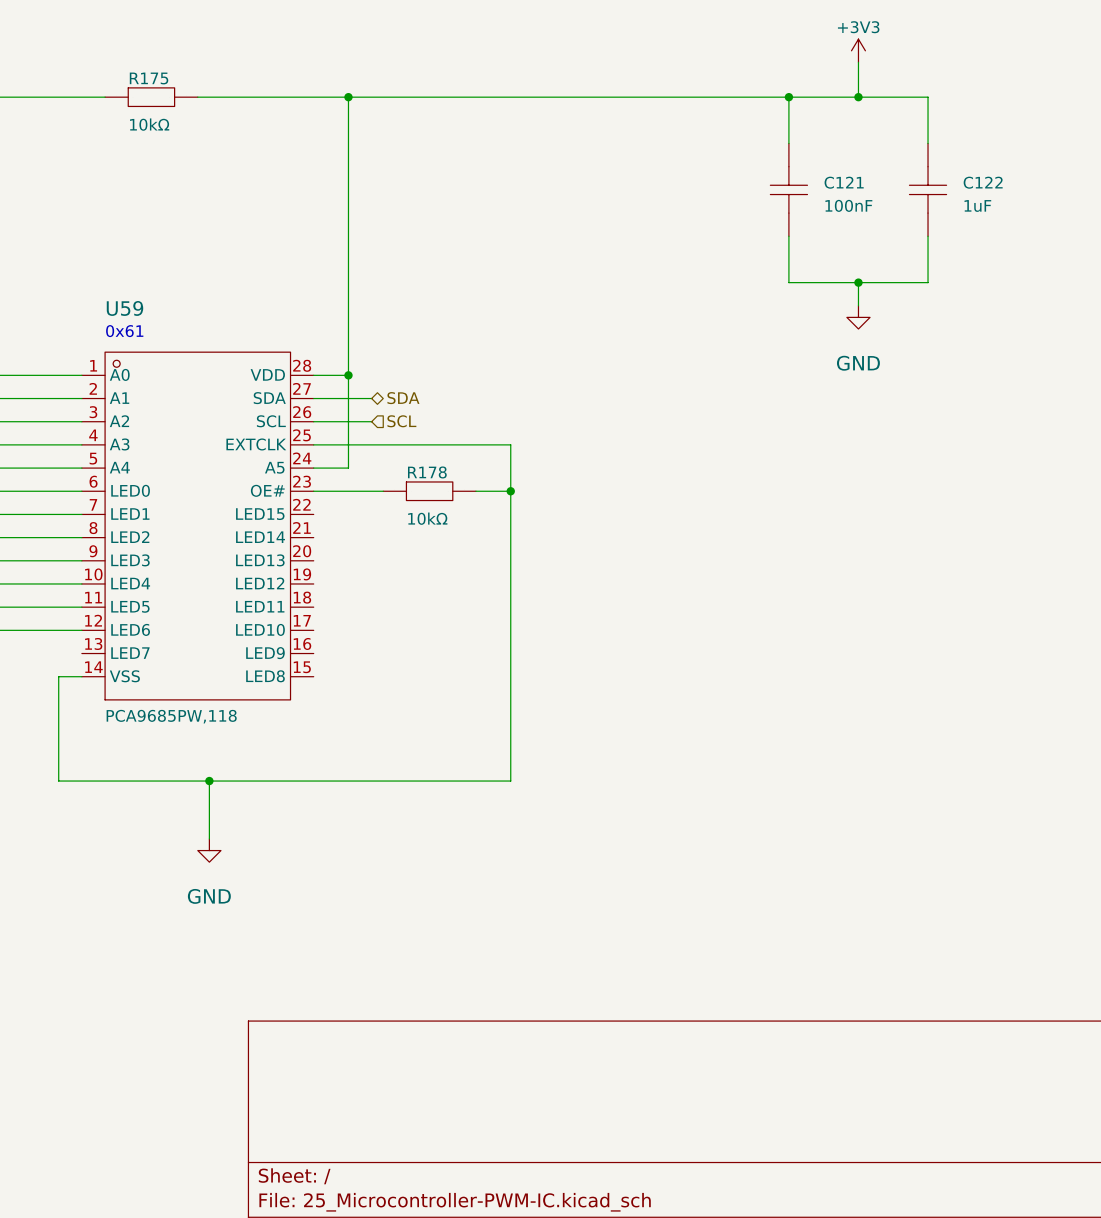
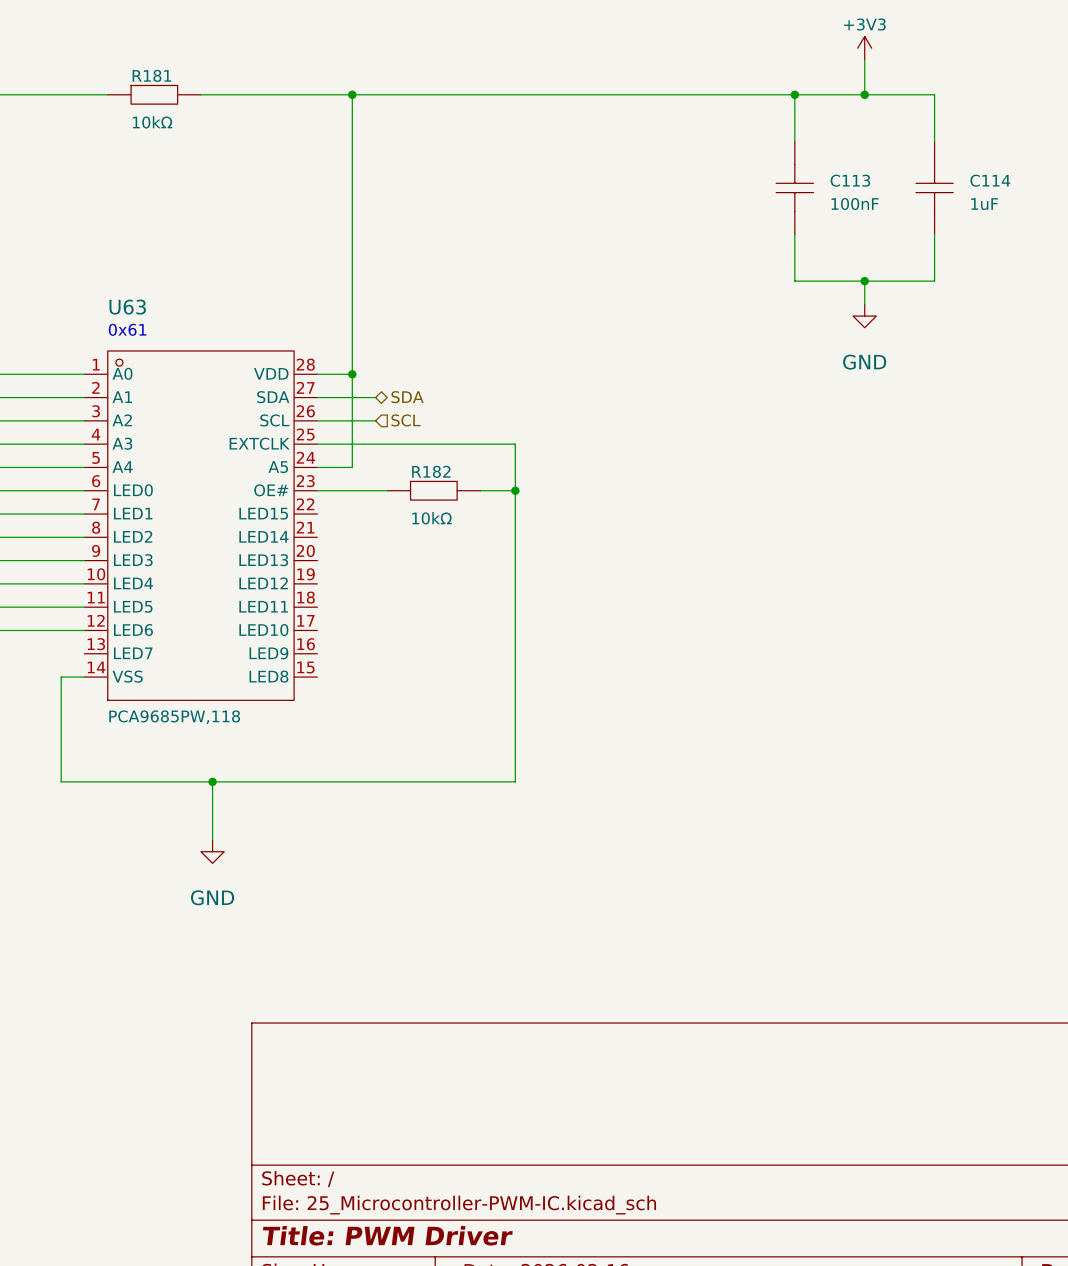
R175 name: R175 (149, 78) -> R181 (151, 75)
C121 name: C121 (844, 182) -> C113 (850, 180)
C122 name: C122 (983, 182) -> C114 (990, 180)
U59 name: U59 (124, 308) -> U63 (127, 307)
R178 name: R178 (427, 472) -> R182 (431, 471)

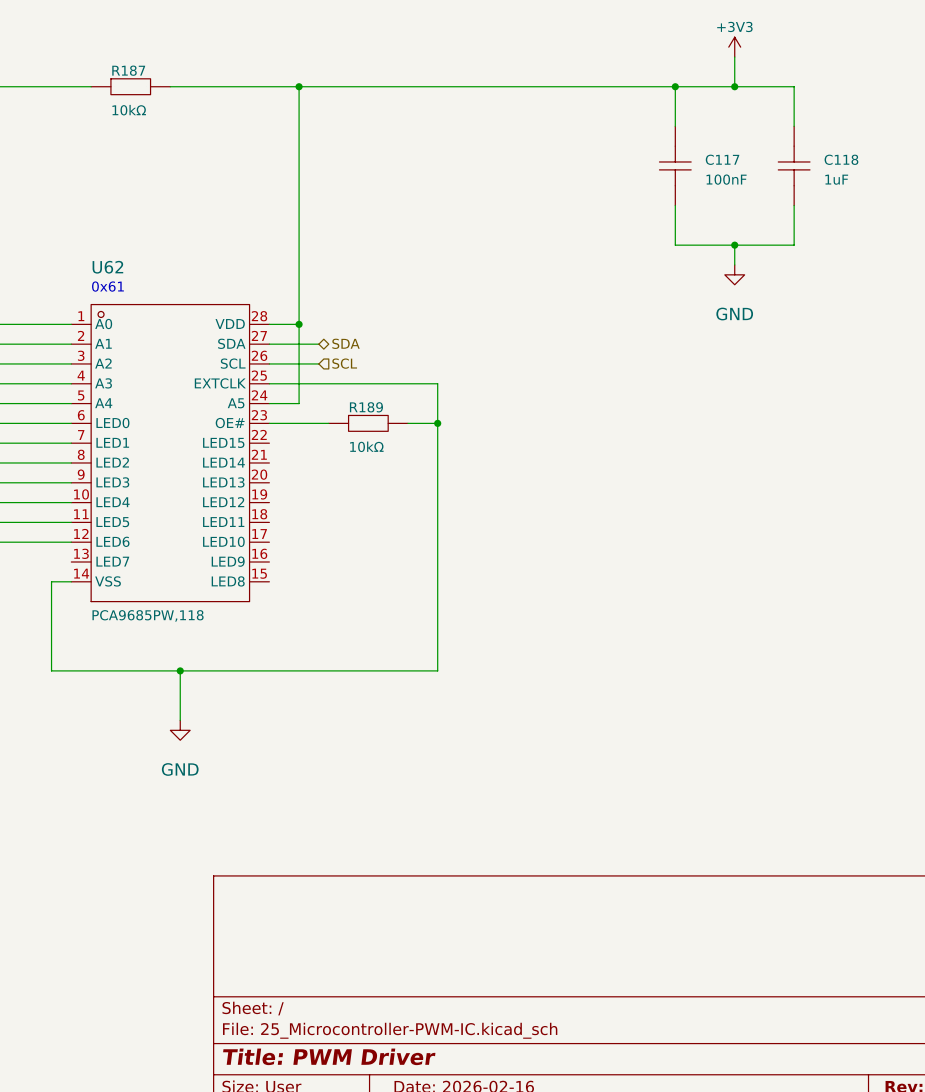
R181 name: R181 (151, 75) -> R187 (128, 70)
C113 name: C113 (850, 180) -> C117 (722, 159)
C114 name: C114 (990, 180) -> C118 (841, 159)
U63 name: U63 (127, 307) -> U62 (107, 267)
R182 name: R182 (431, 471) -> R189 (366, 407)

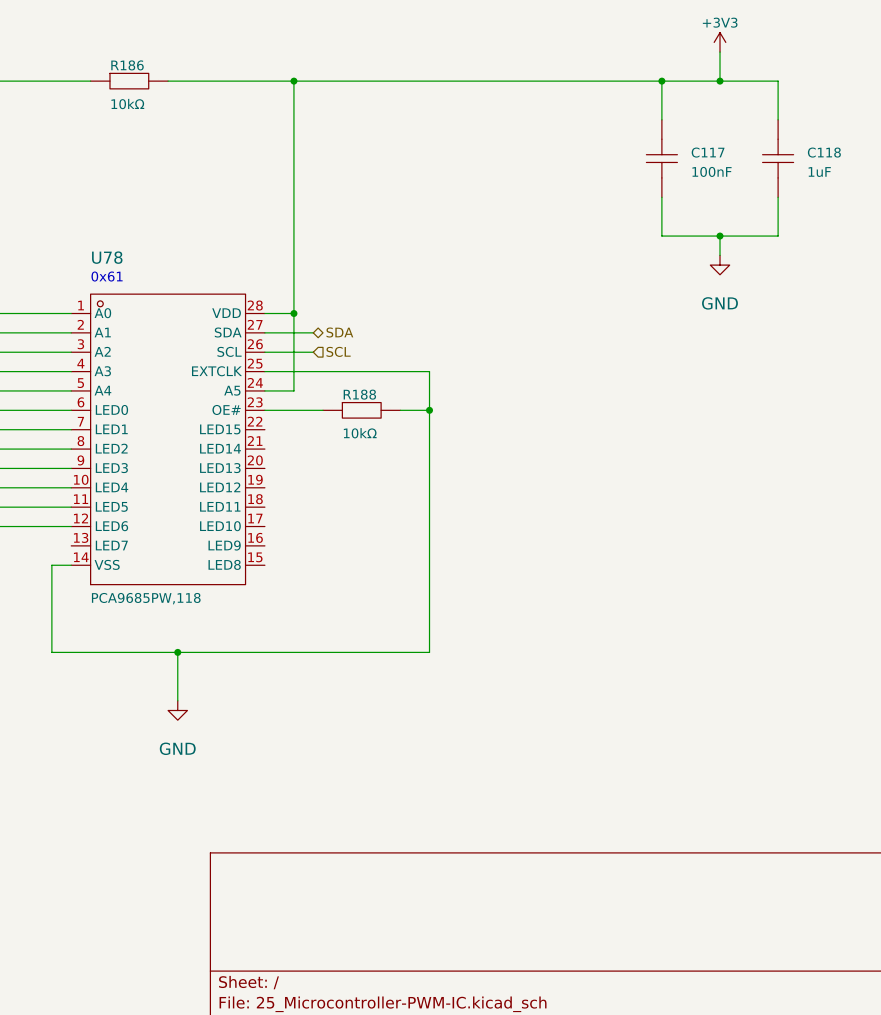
R187 name: R187 (128, 70) -> R186 (127, 65)
U62 name: U62 (107, 267) -> U78 (107, 257)
R189 name: R189 (366, 407) -> R188 (359, 394)

